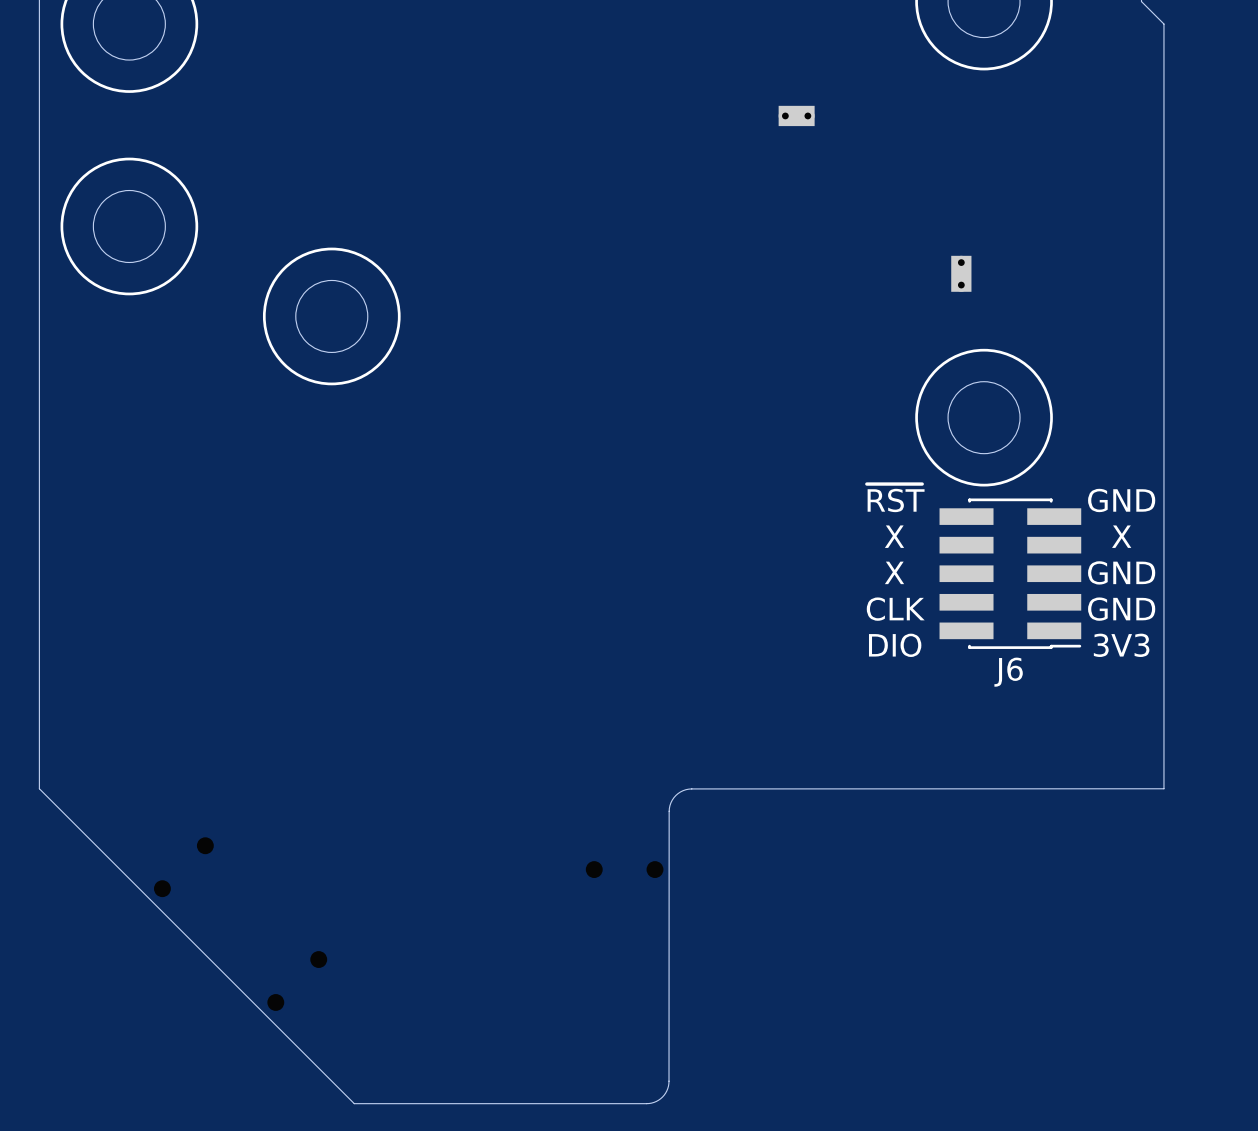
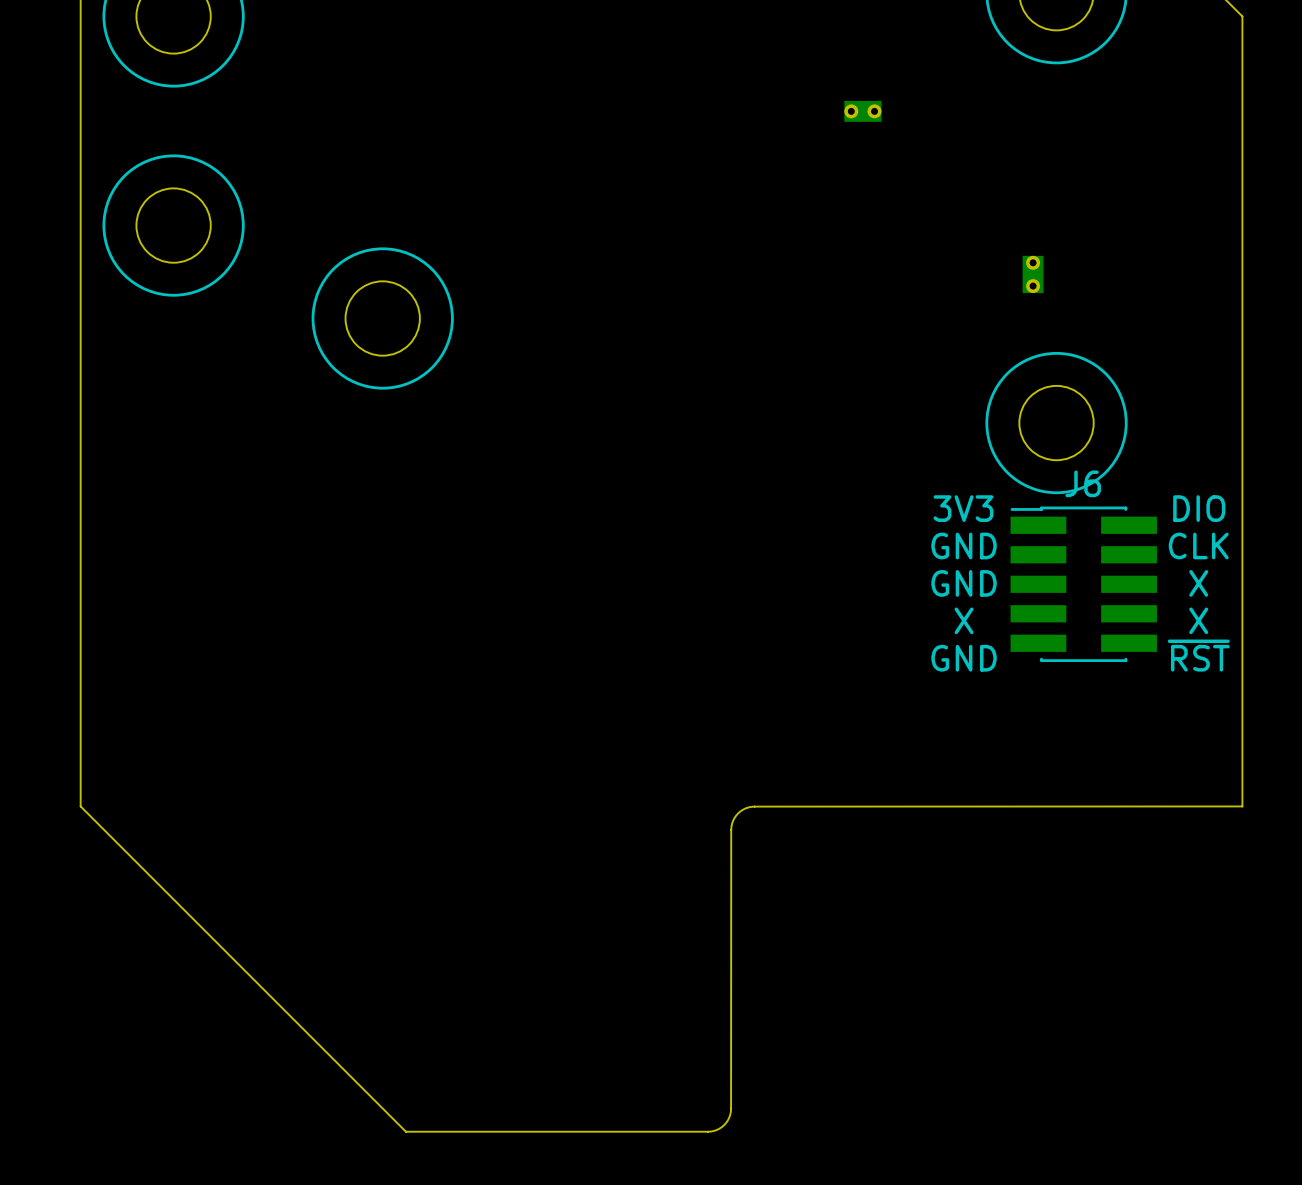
text: ~{RST} (895, 498) -> 3V3 (963, 508)
text: GND (1121, 500) -> DIO (1199, 508)
text: X (894, 536) -> GND (964, 546)
text: X (1121, 536) -> CLK (1198, 546)
text: X (894, 572) -> GND (964, 583)
text: GND (1121, 572) -> X (1198, 583)
J6 rotation: 0° (1010, 573) -> 180° (1083, 584)
text: CLK (895, 609) -> X (964, 620)
text: GND (1121, 609) -> X (1198, 620)
text: DIO (895, 645) -> GND (964, 658)
text: 3V3 (1121, 645) -> ~{RST} (1198, 655)

